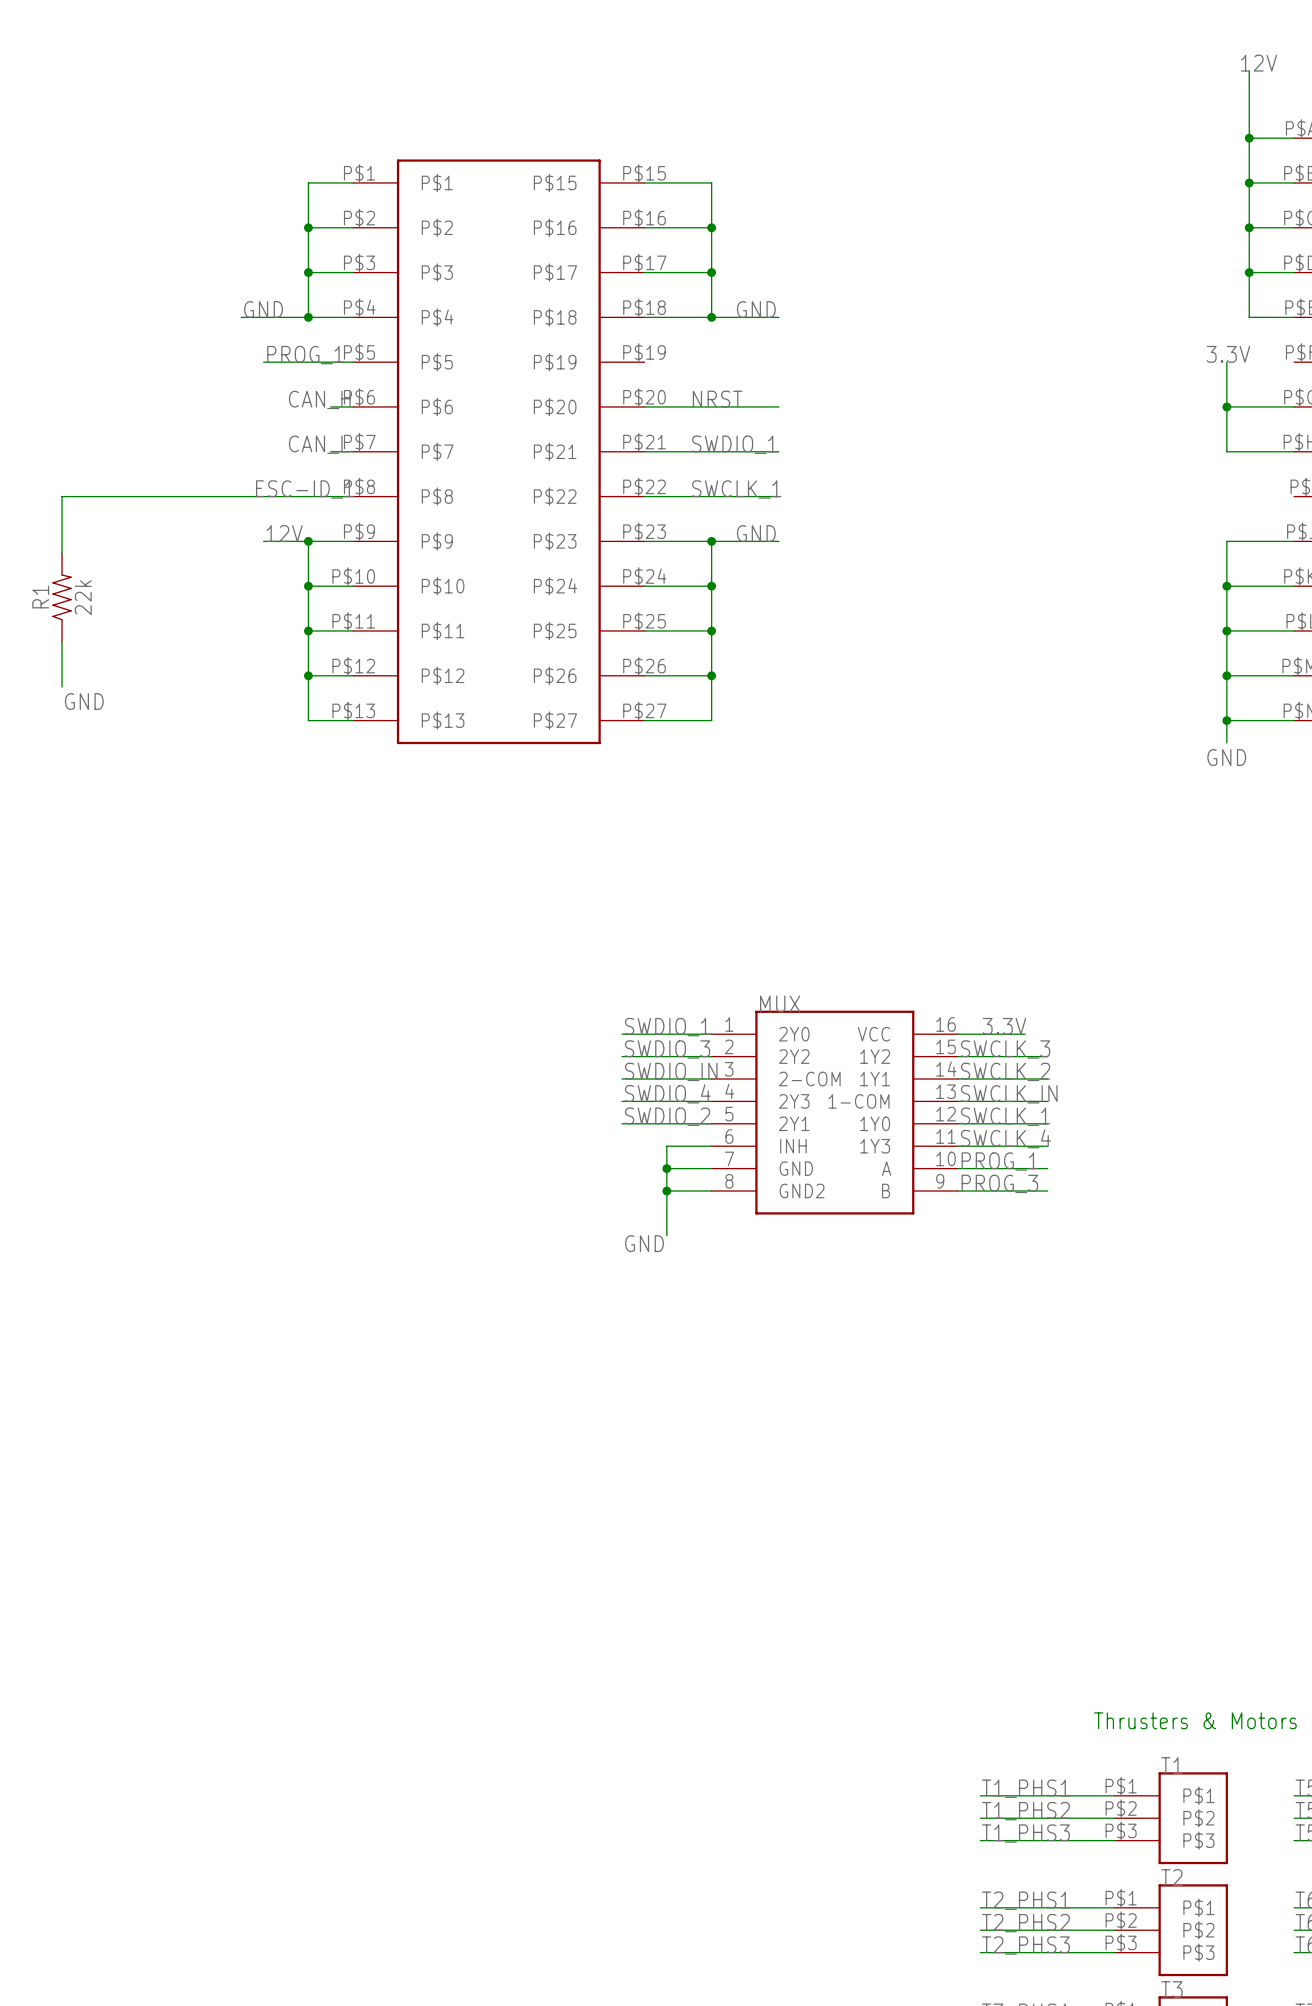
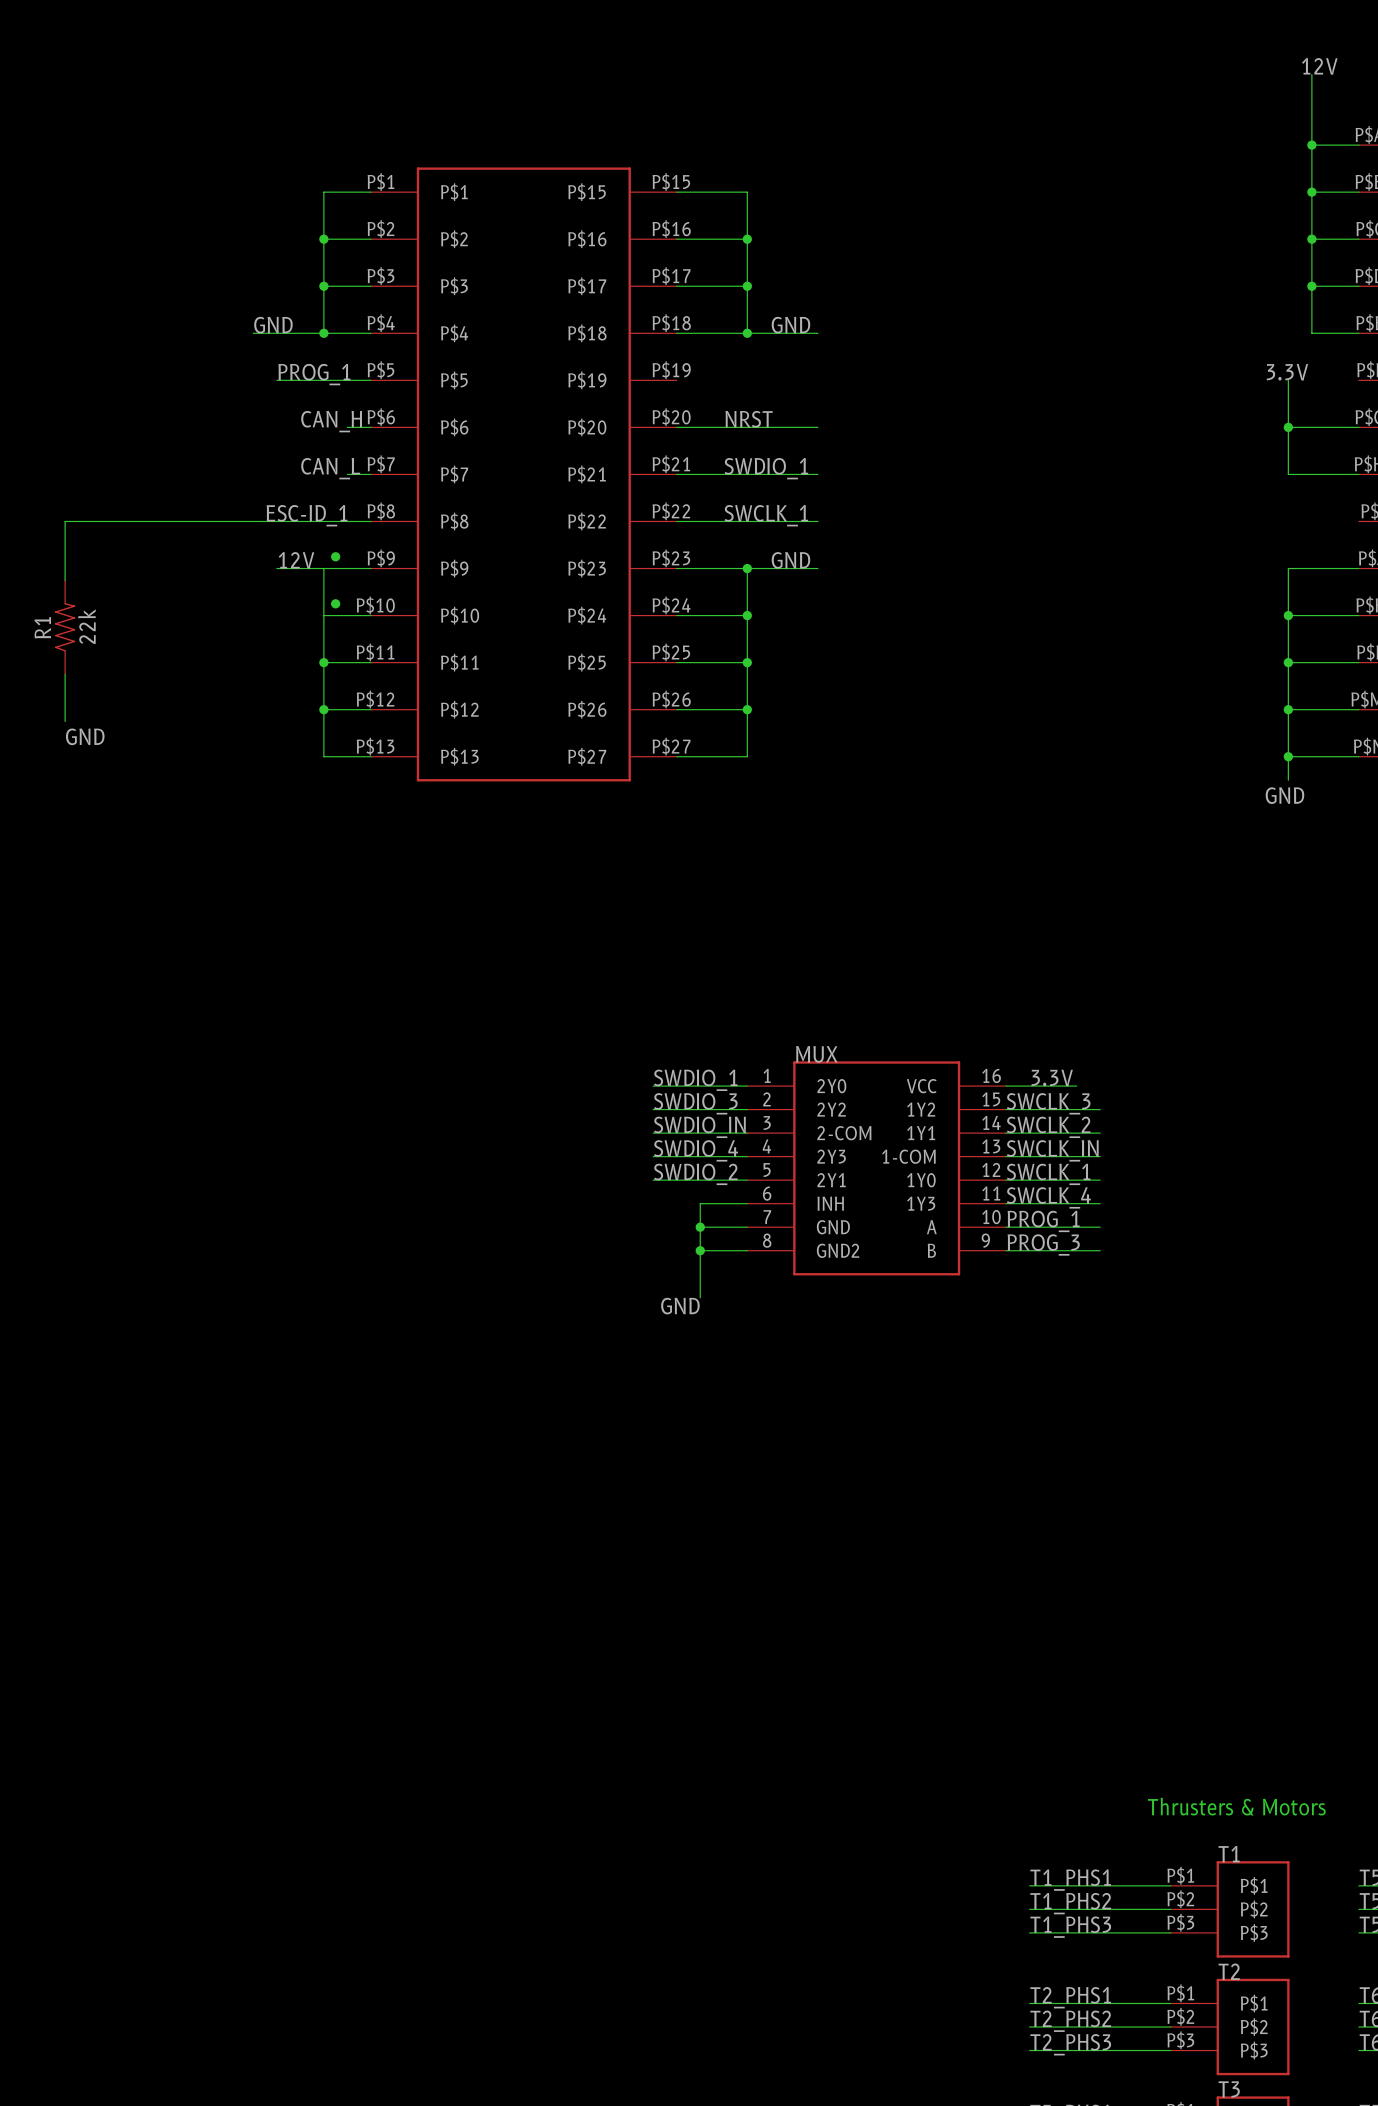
junction position: (308, 541) -> (335, 556)
junction position: (308, 586) -> (335, 603)

